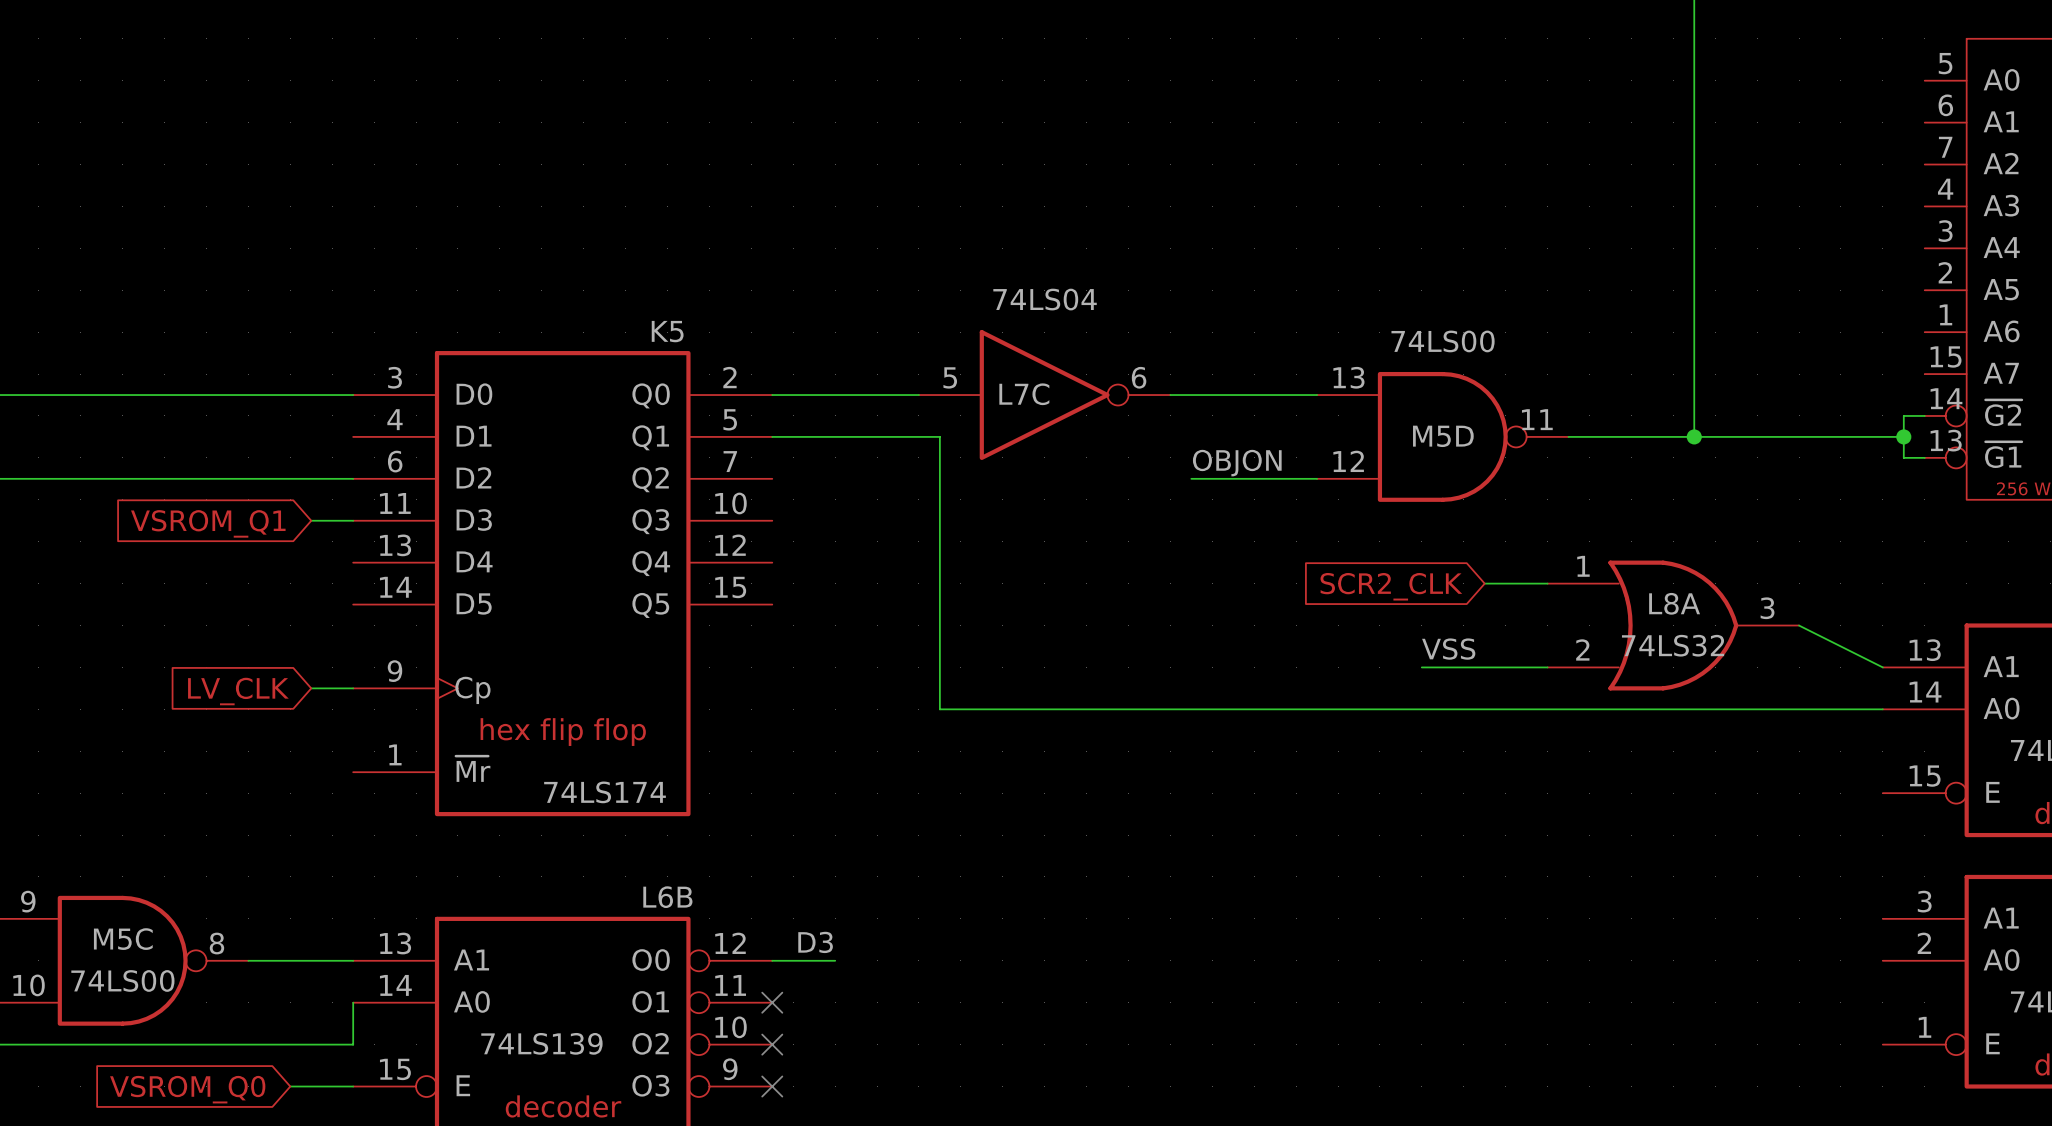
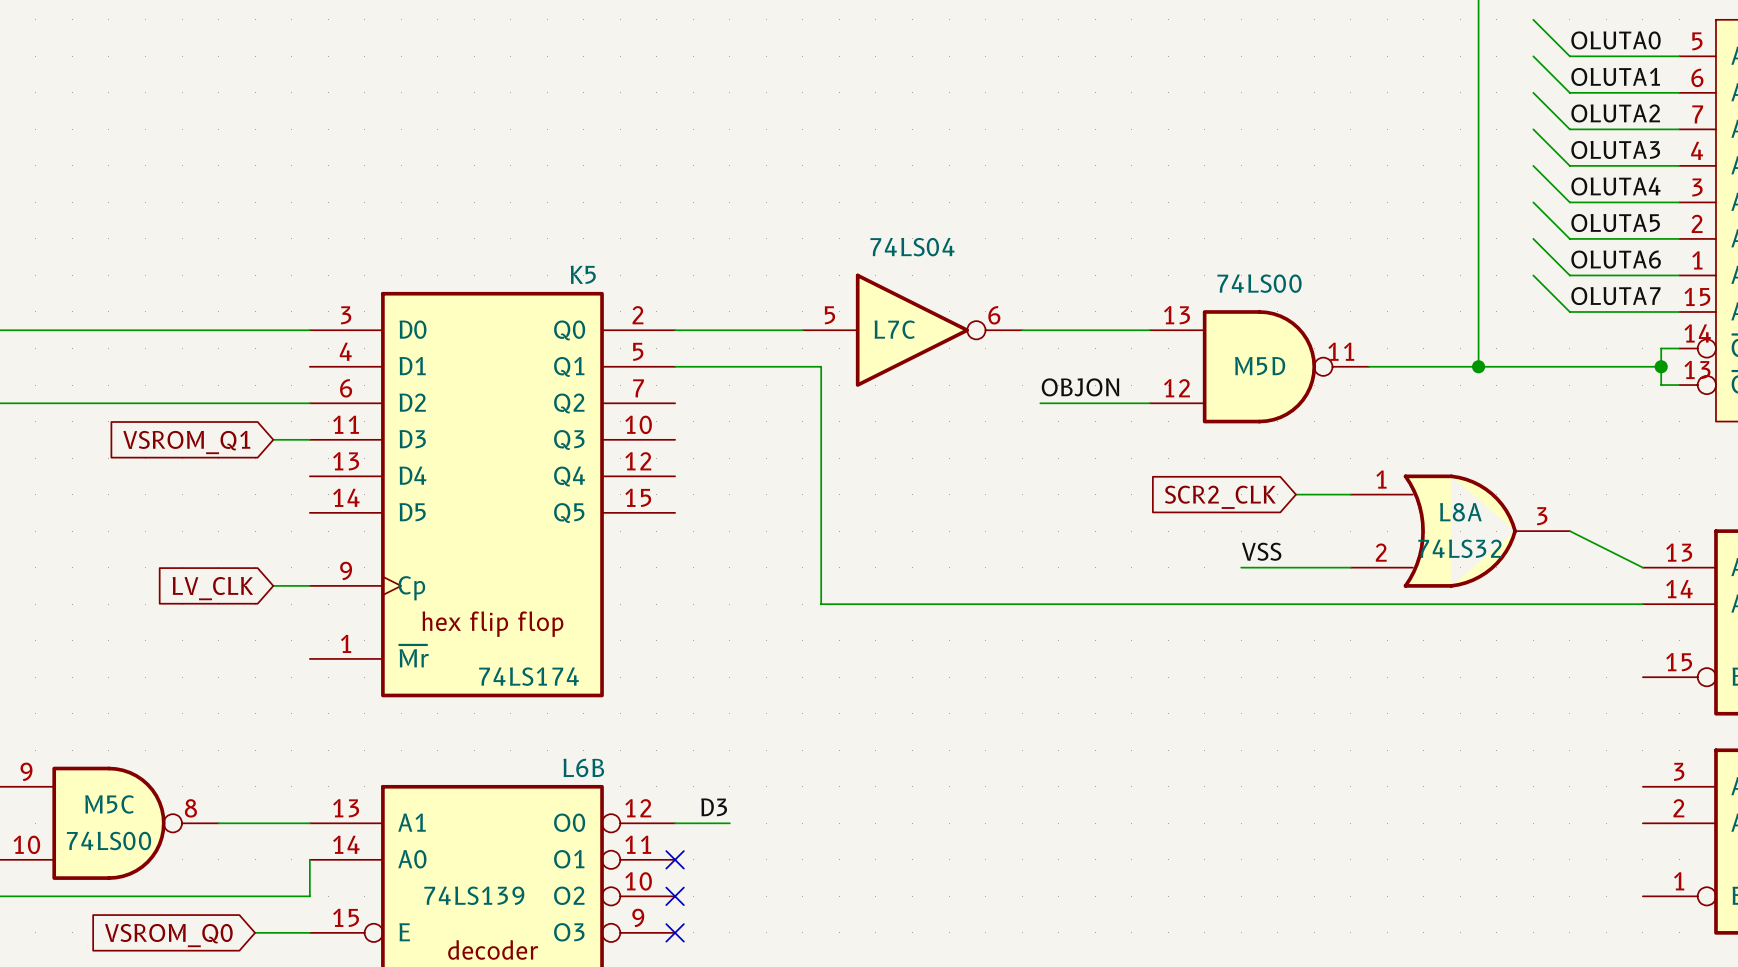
wire: none -> (1533, 19) (1569, 56) (1679, 56)
label: none -> OLUTA0 (1616, 40)
wire: none -> (1533, 56) (1569, 92) (1679, 92)
label: none -> OLUTA1 (1615, 76)
wire: none -> (1533, 92) (1569, 129) (1679, 129)
label: none -> OLUTA2 (1615, 113)
wire: none -> (1533, 129) (1569, 165) (1679, 165)
label: none -> OLUTA3 (1615, 149)
wire: none -> (1533, 165) (1569, 202) (1679, 202)
label: none -> OLUTA4 (1615, 186)
wire: none -> (1533, 202) (1569, 238) (1679, 238)
label: none -> OLUTA5 (1615, 223)
wire: none -> (1533, 238) (1569, 275) (1679, 275)
label: none -> OLUTA6 (1616, 259)
wire: none -> (1533, 275) (1569, 311) (1679, 311)
label: none -> OLUTA7 (1615, 296)

